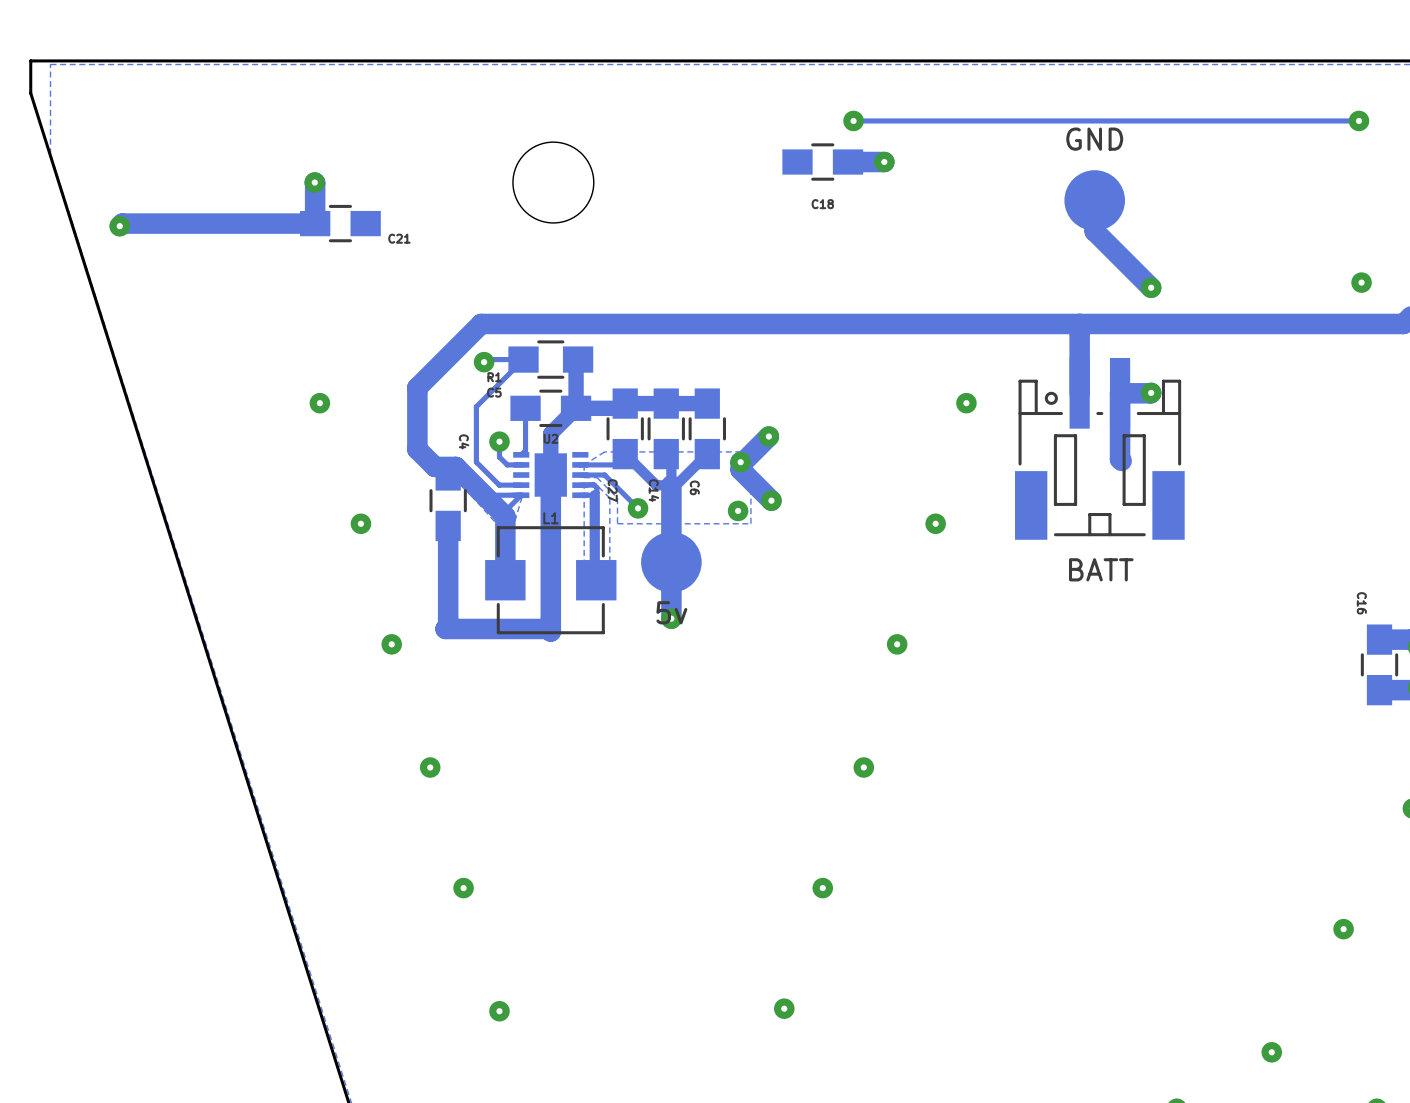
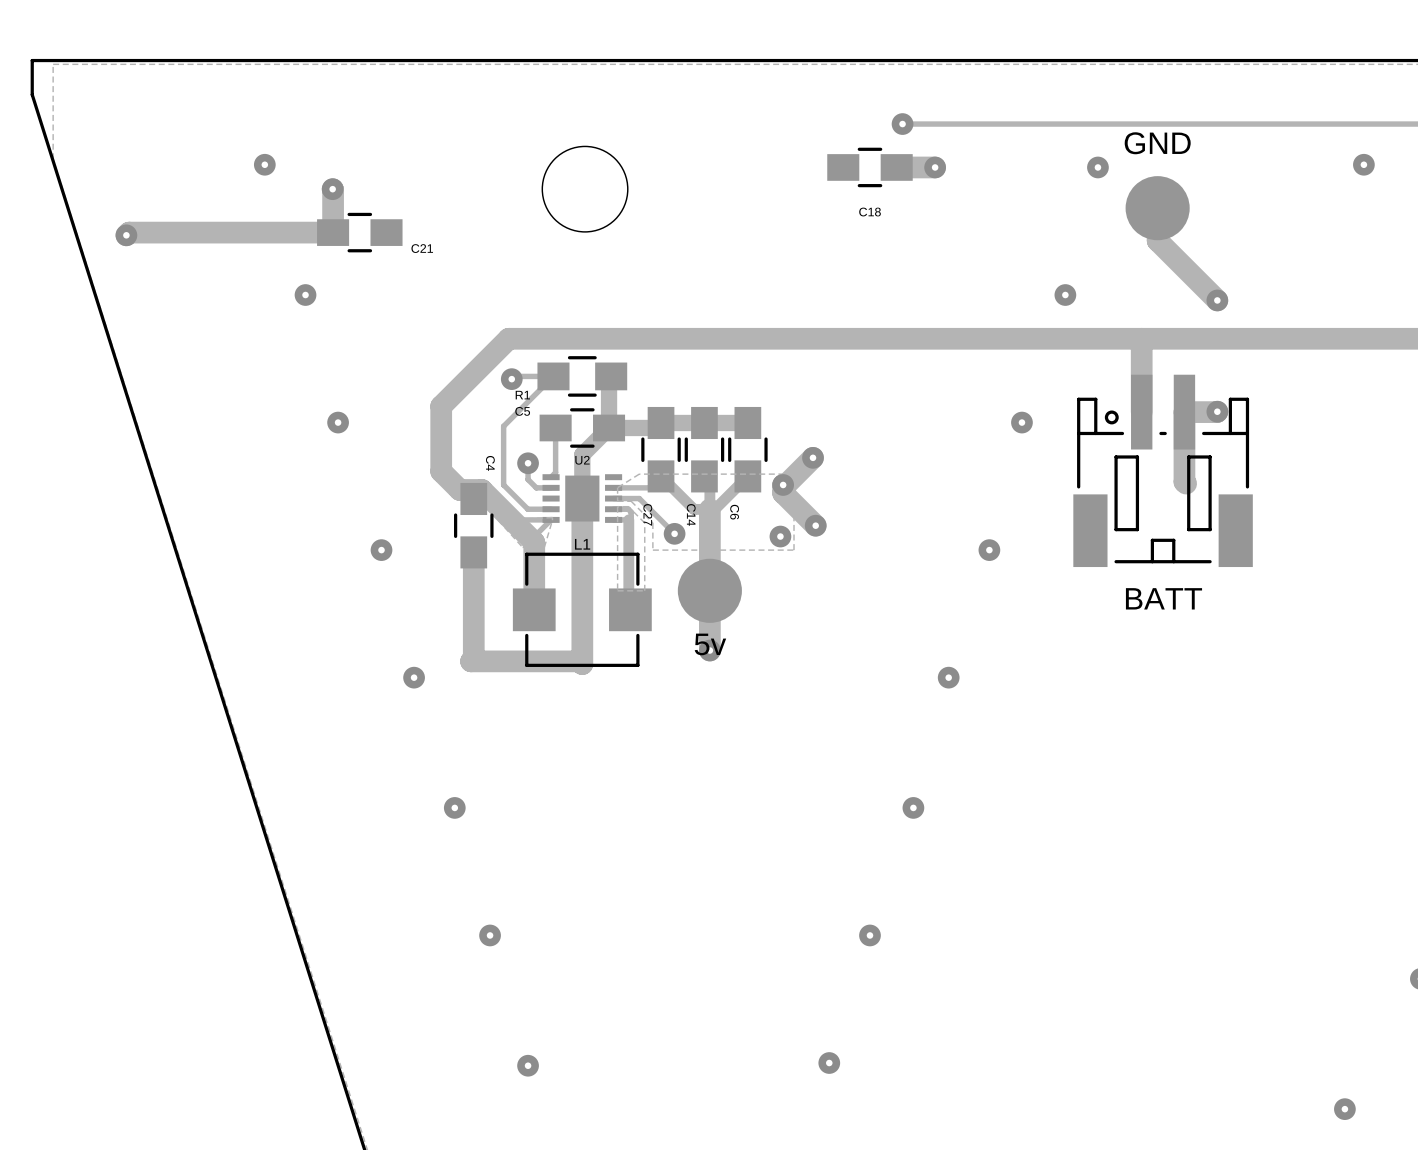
via: none -> (264, 164)
via: none -> (1363, 164)
via: none -> (1097, 167)
via: none -> (305, 295)
via: none -> (1065, 295)

